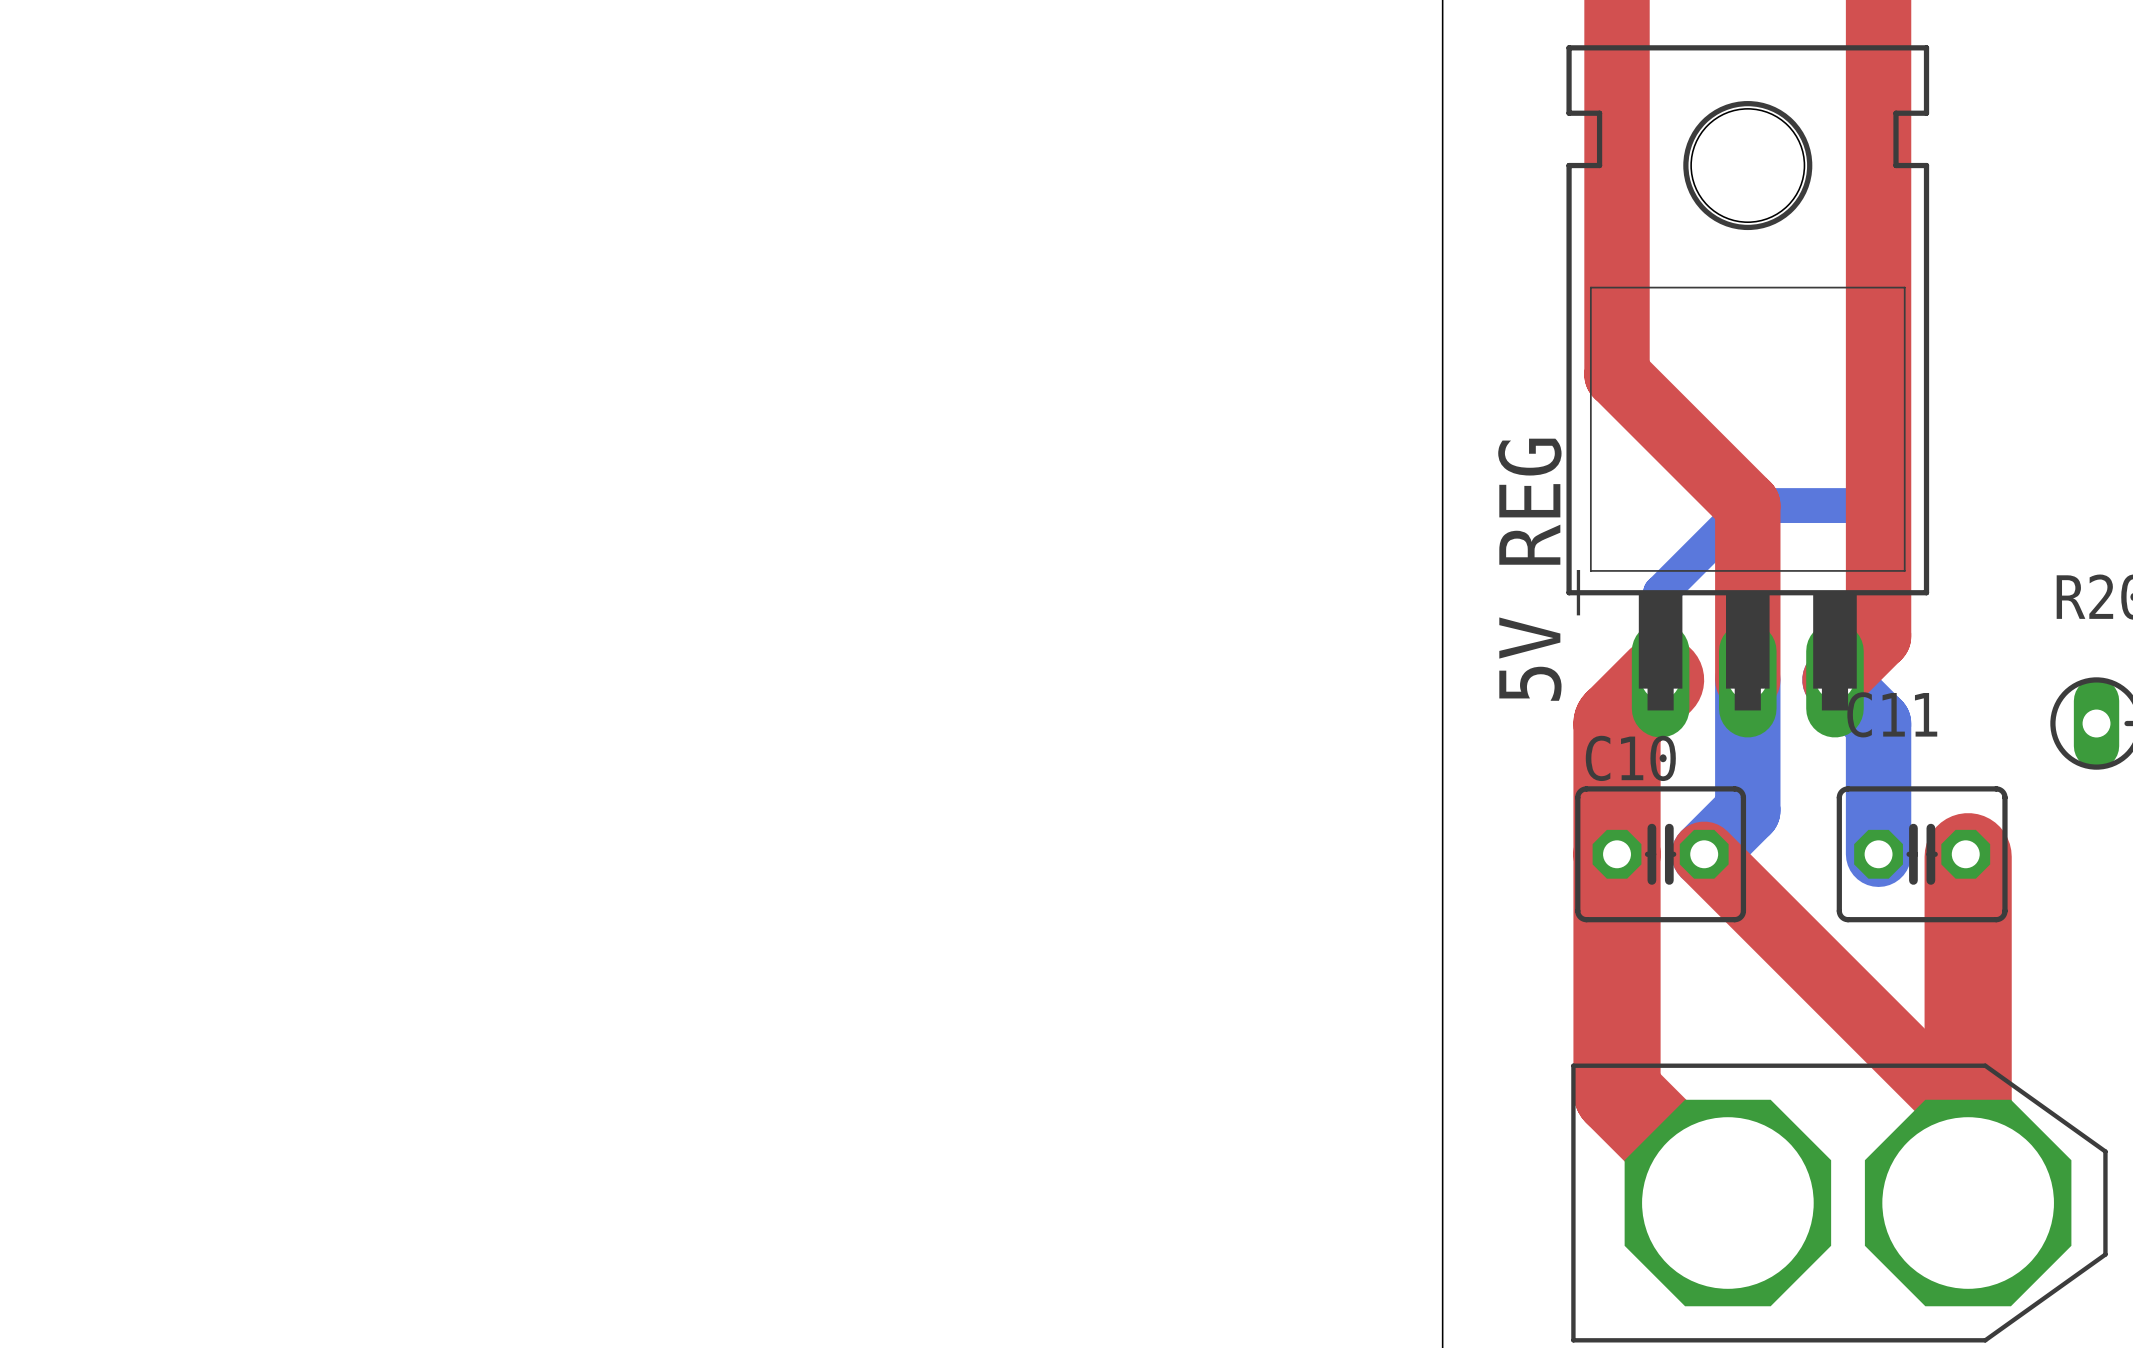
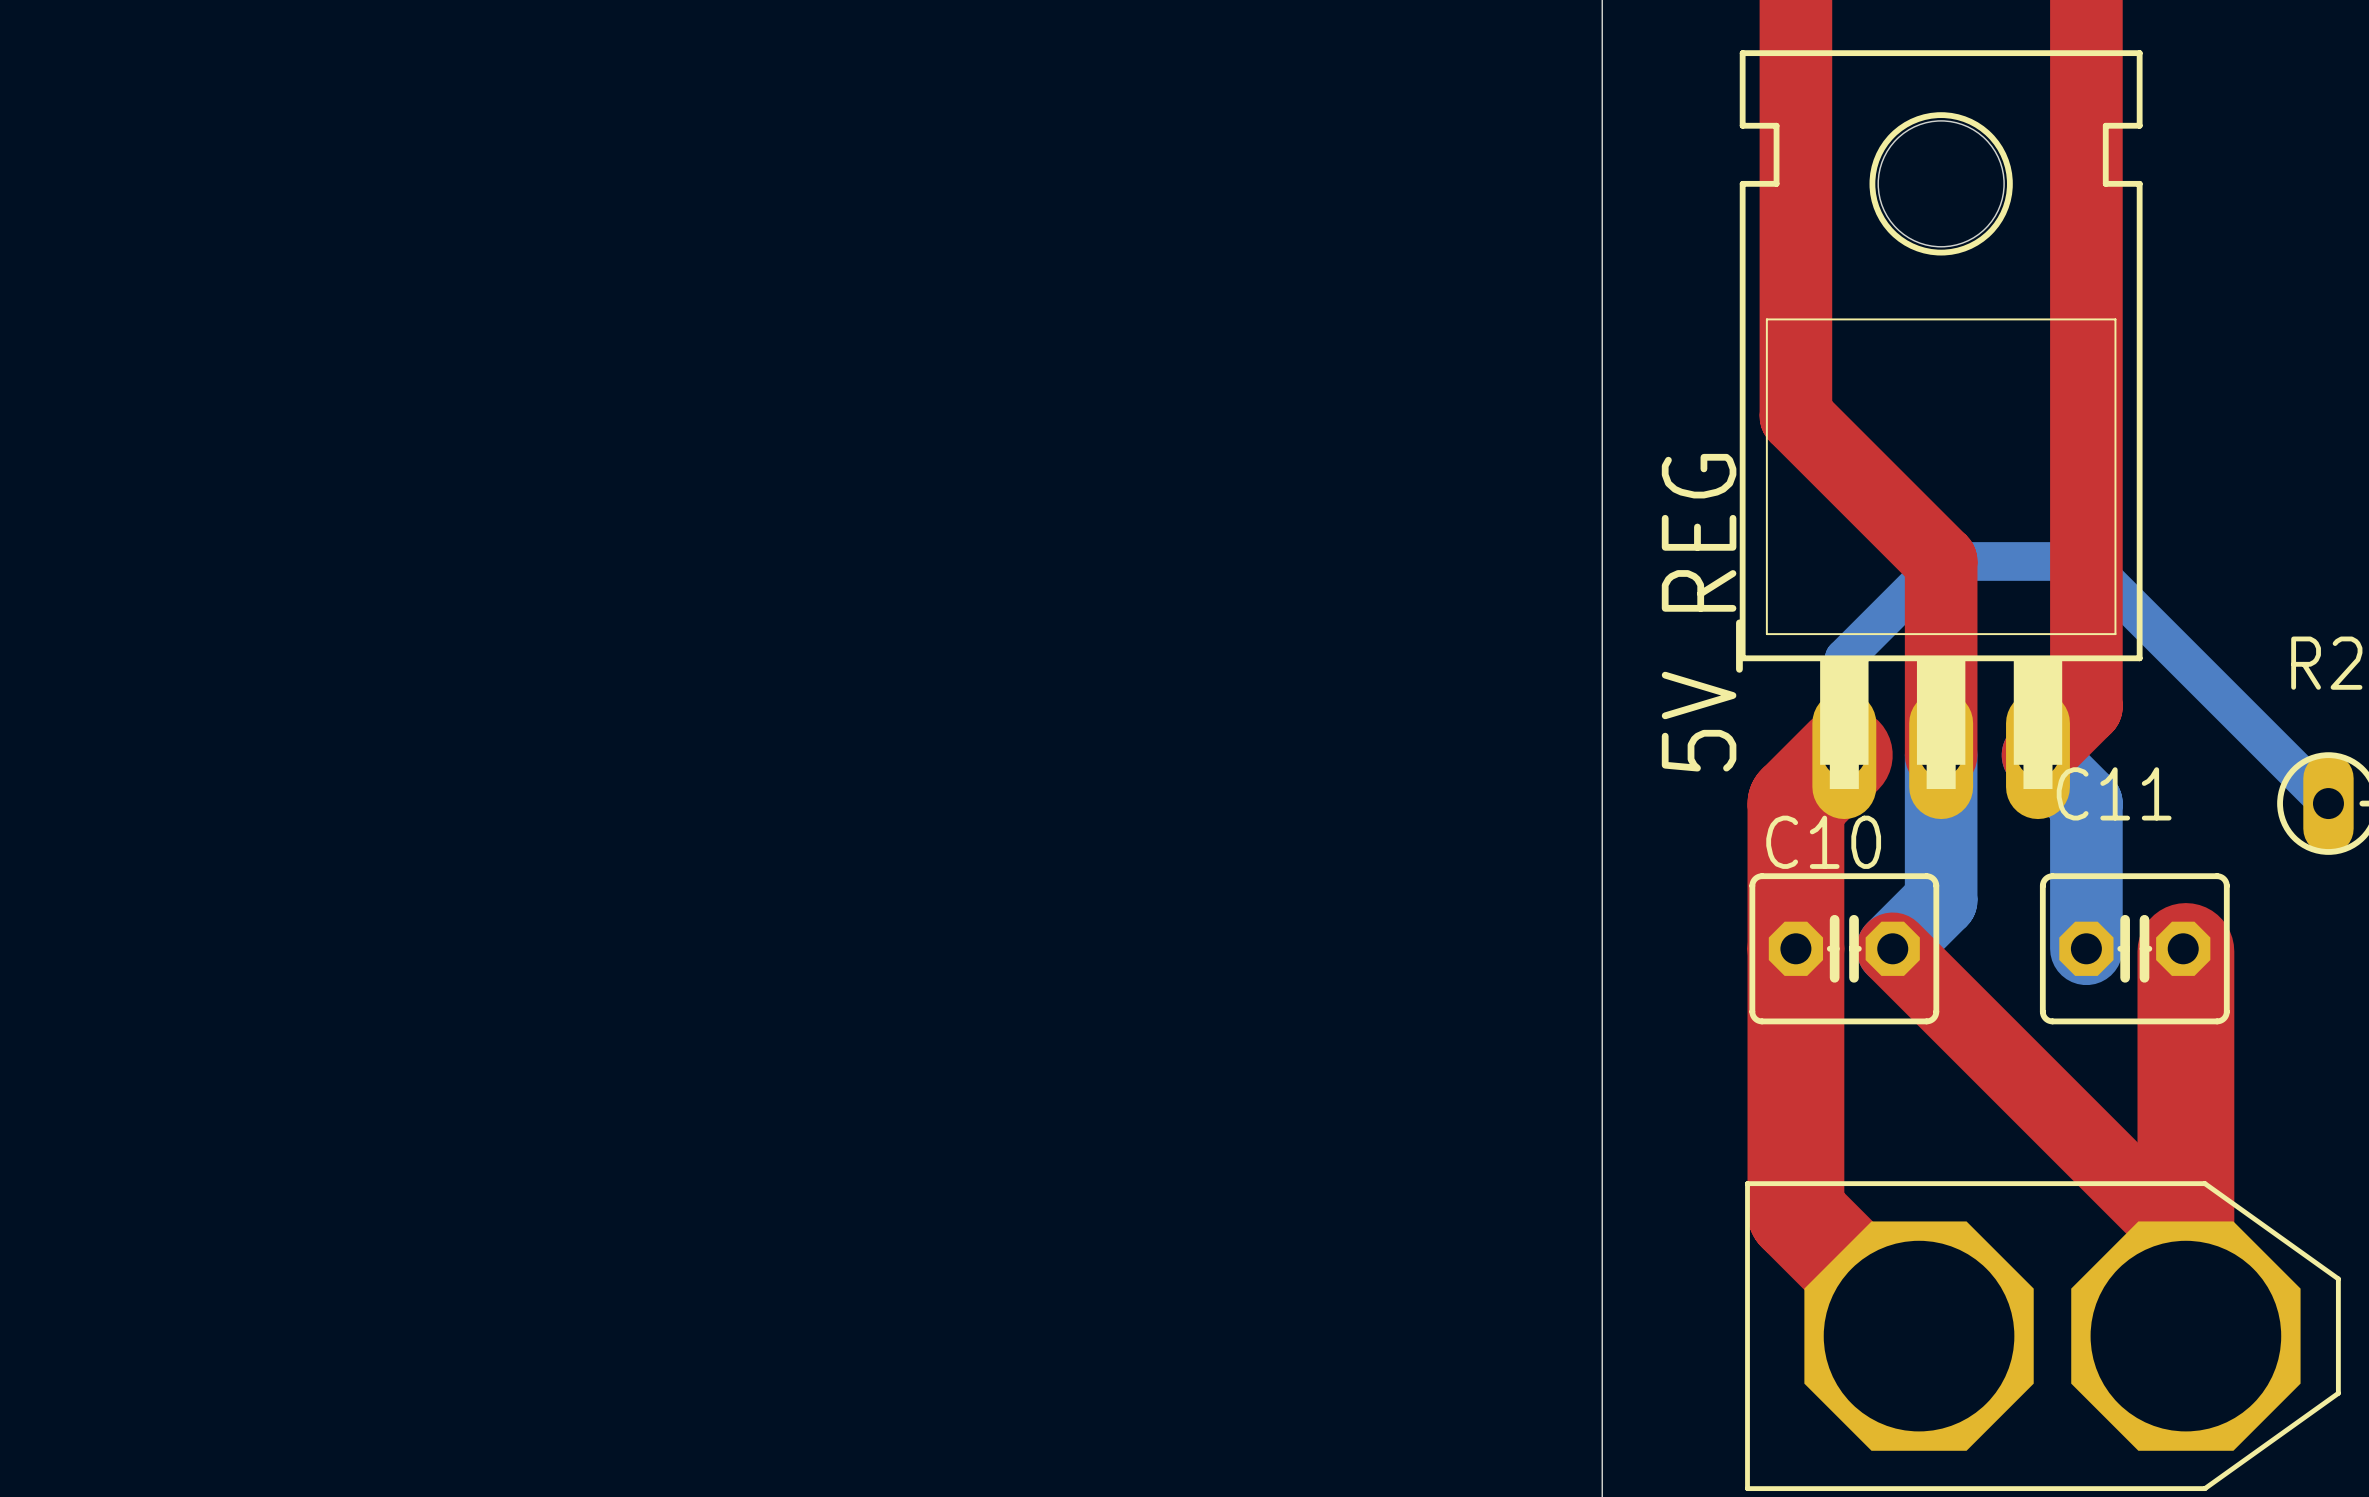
bottom track: none -> (2086, 561) (2328, 803)

